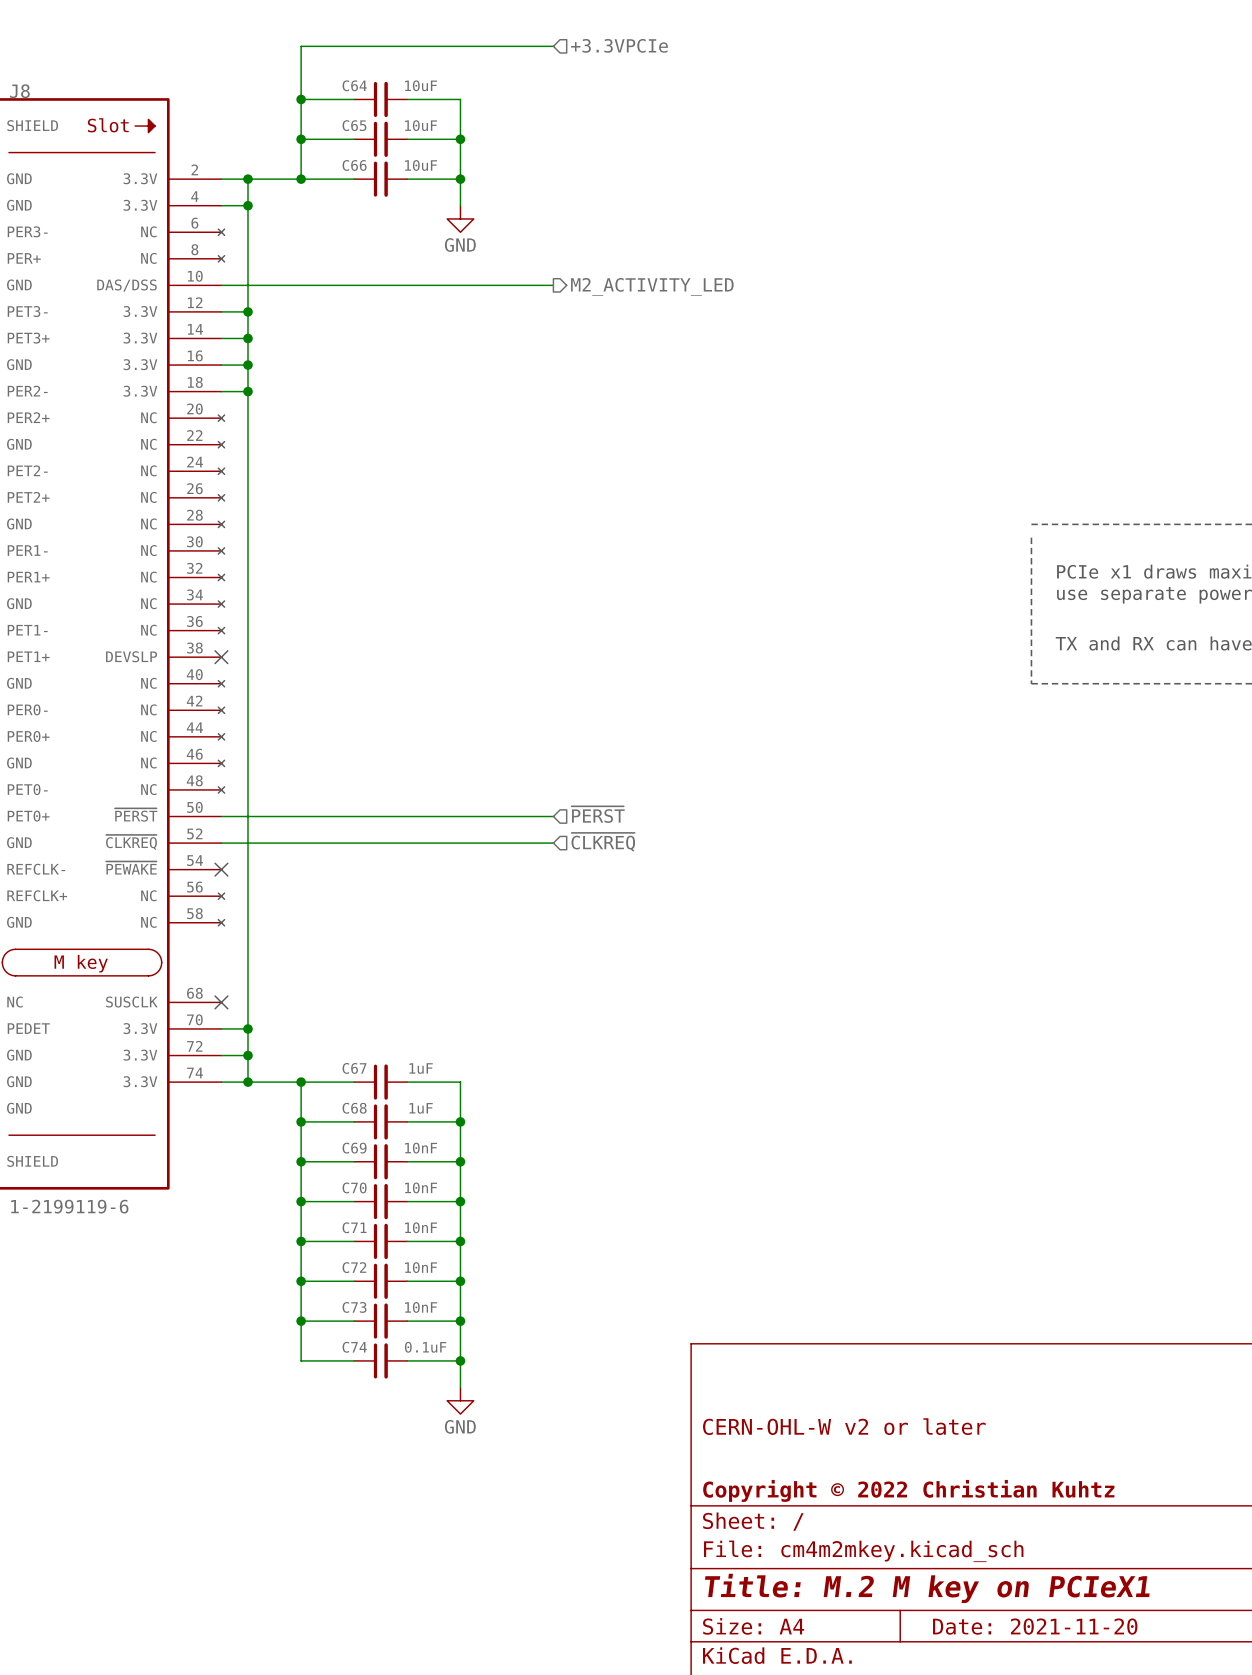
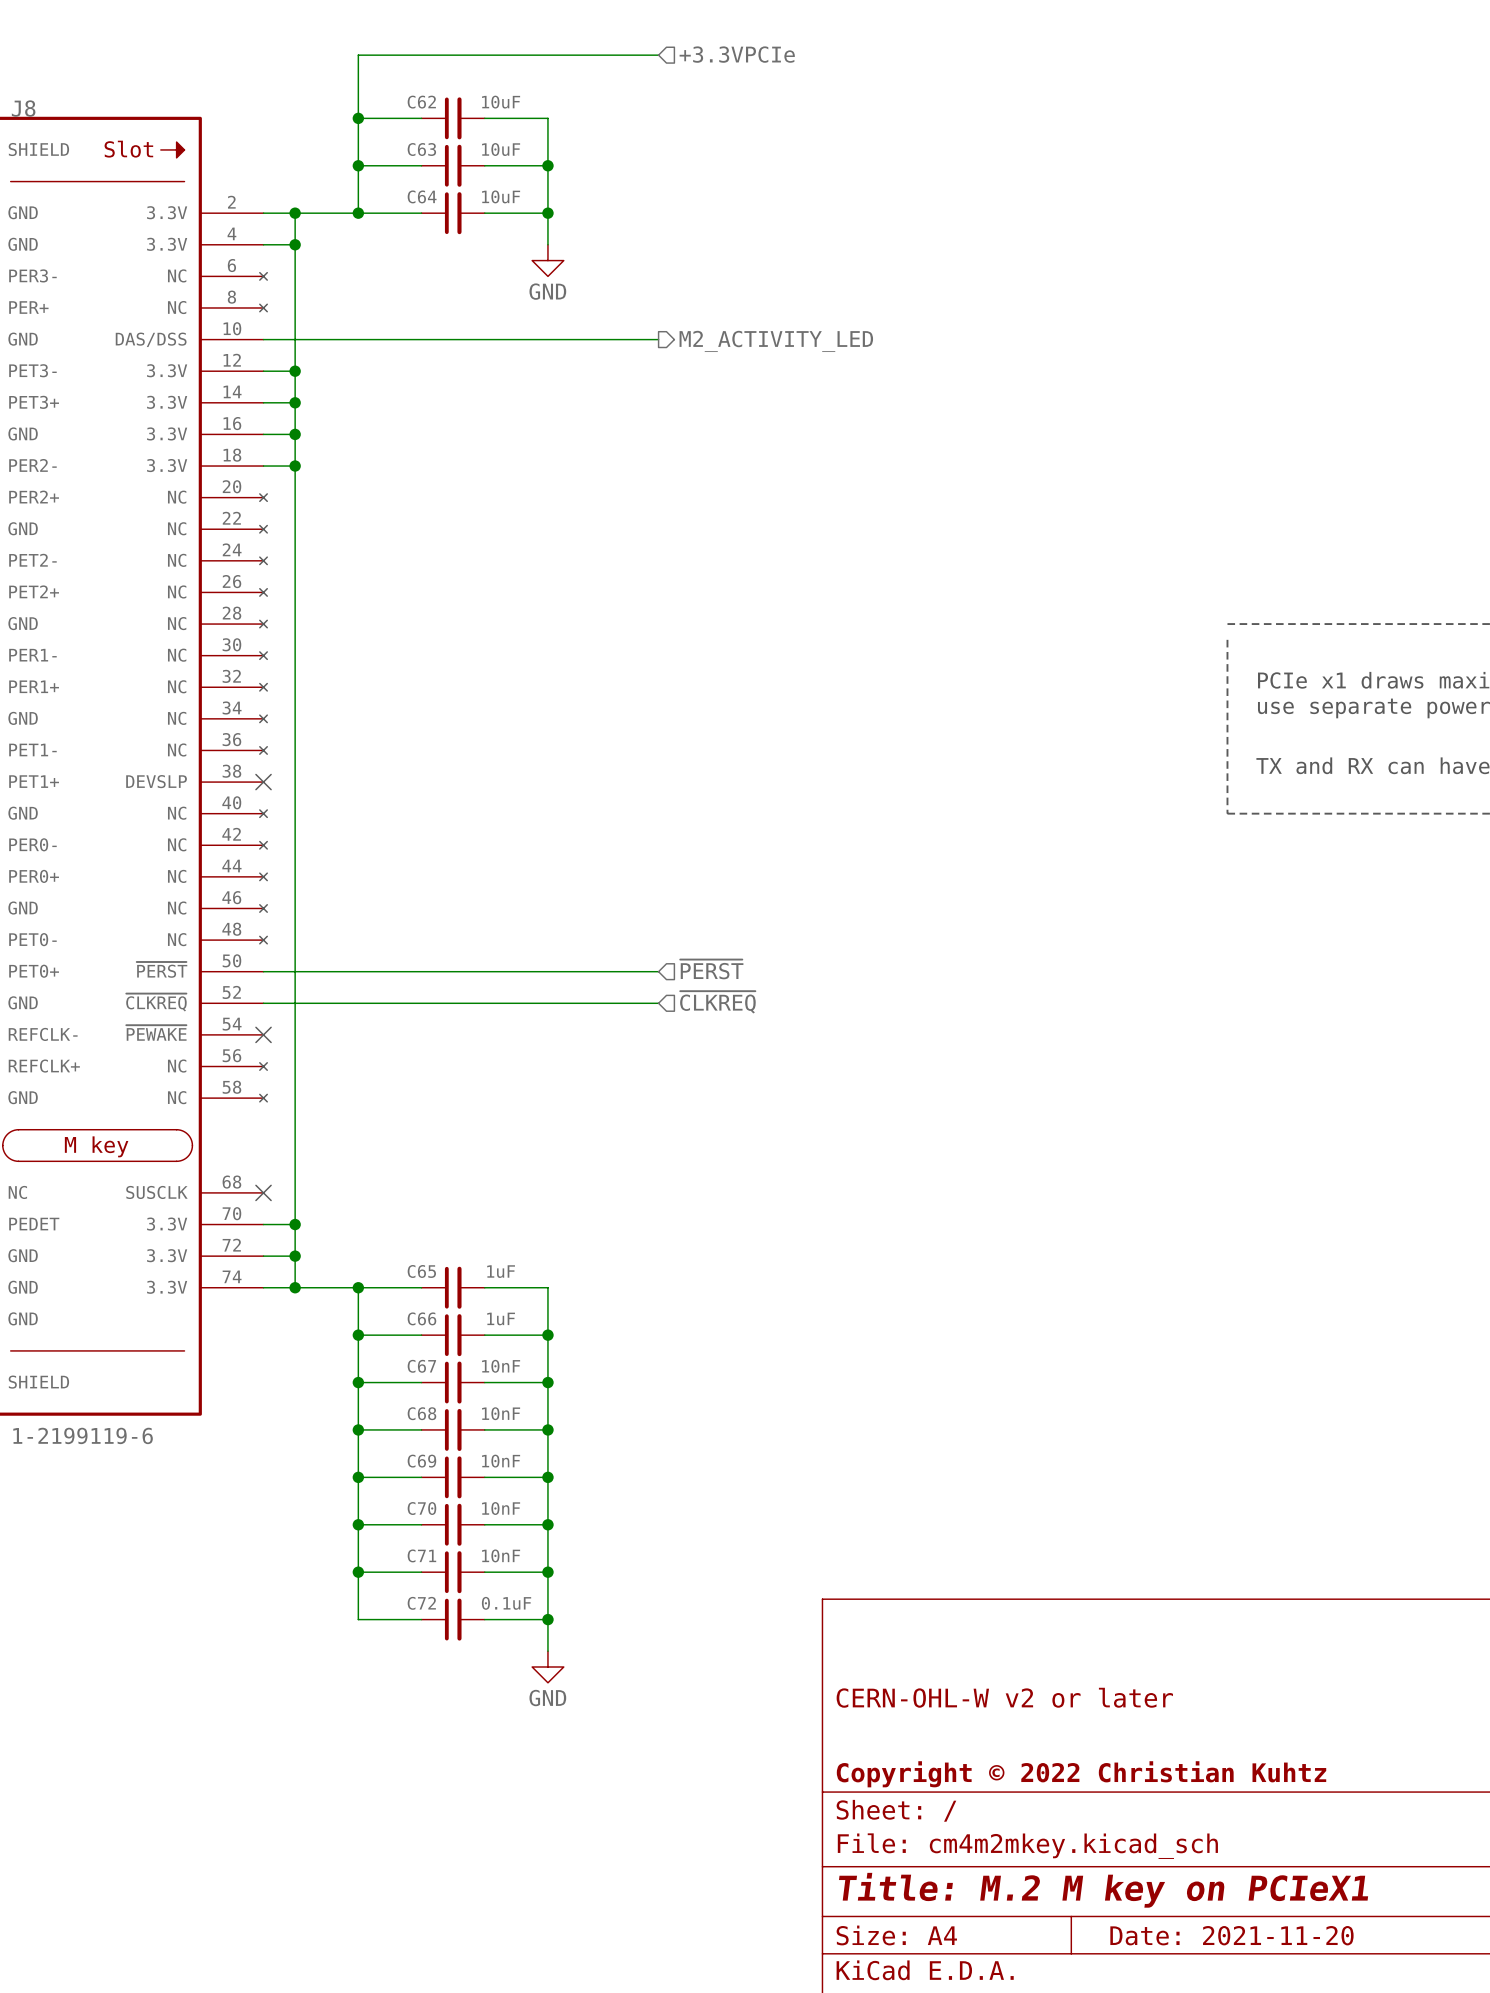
C64 name: C64 (354, 85) -> C62 (421, 102)
C65 name: C65 (354, 125) -> C63 (421, 149)
C66 name: C66 (354, 165) -> C64 (422, 196)
C67 name: C67 (354, 1068) -> C65 (421, 1271)
C68 name: C68 (354, 1108) -> C66 (421, 1318)
C69 name: C69 (354, 1148) -> C67 (421, 1366)
C70 name: C70 (354, 1187) -> C68 (421, 1413)
C71 name: C71 (354, 1227) -> C69 (421, 1461)
C72 name: C72 (354, 1267) -> C70 (421, 1508)
C73 name: C73 (354, 1307) -> C71 (421, 1555)
C74 name: C74 (354, 1347) -> C72 (421, 1603)

